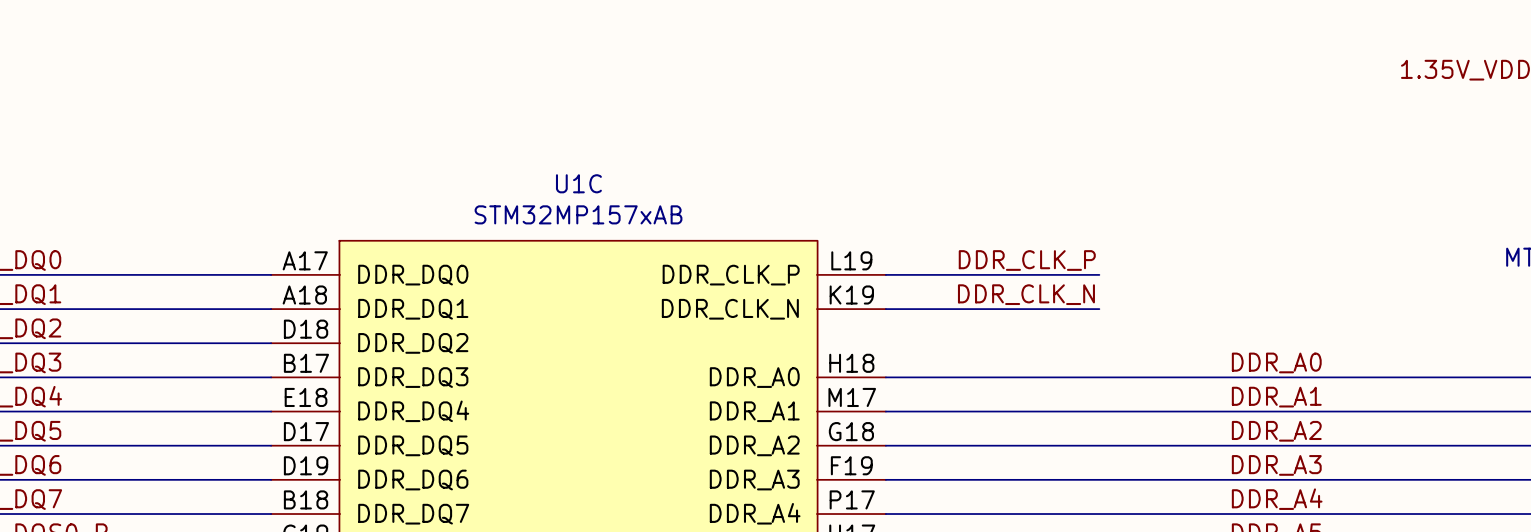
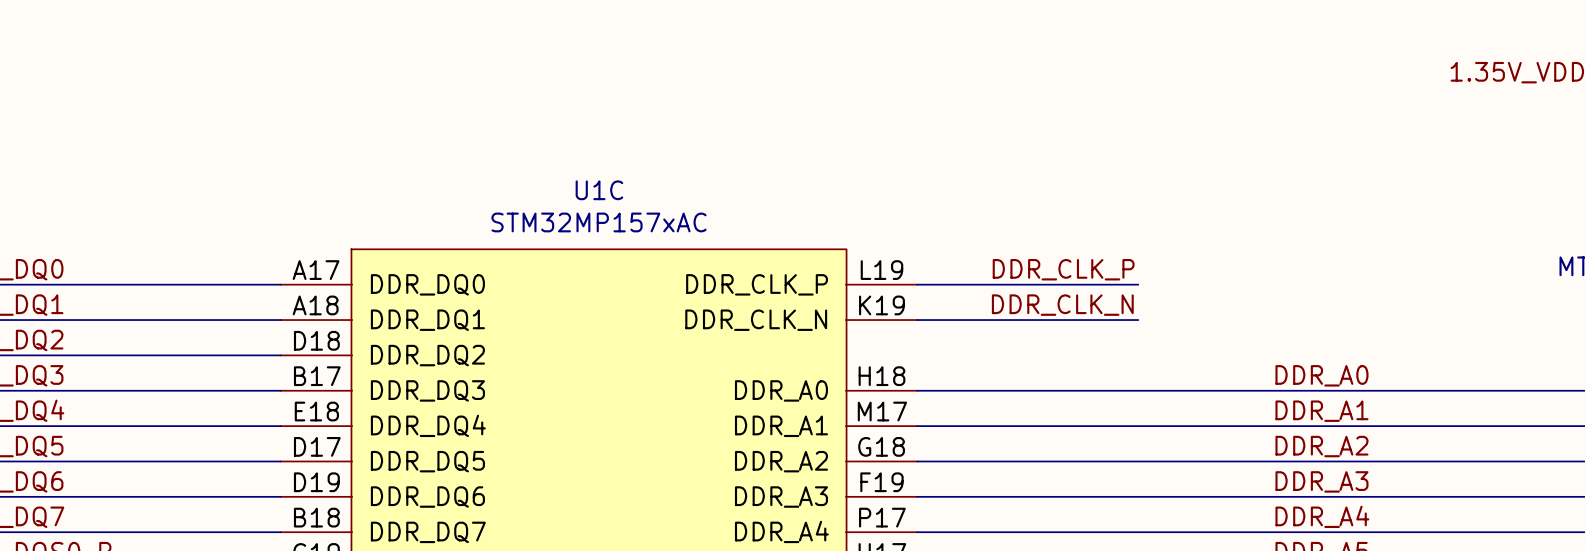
U1C value: STM32MP157xAB (578, 214) -> STM32MP157xAC (599, 222)

